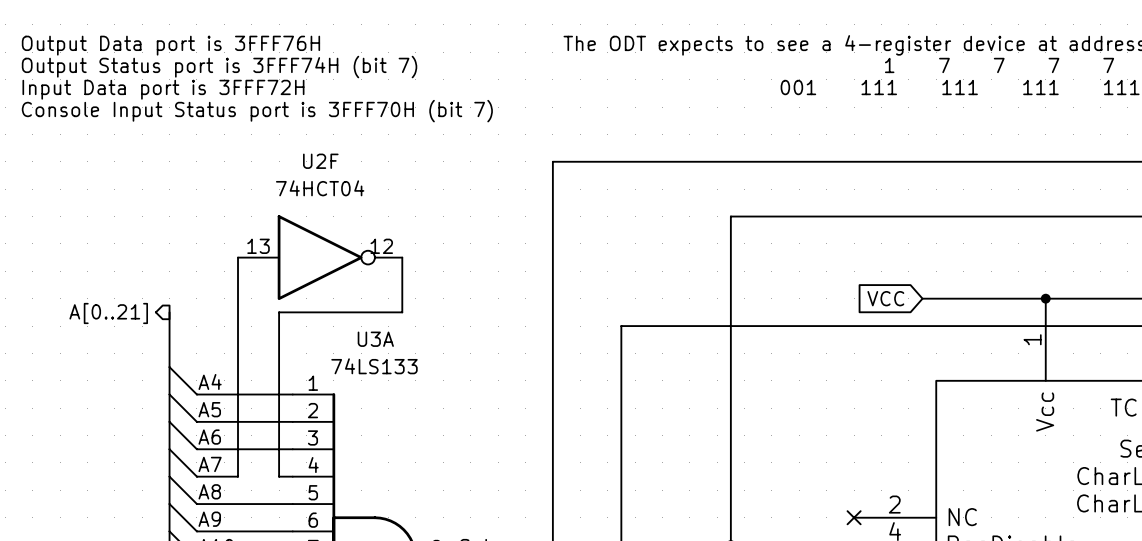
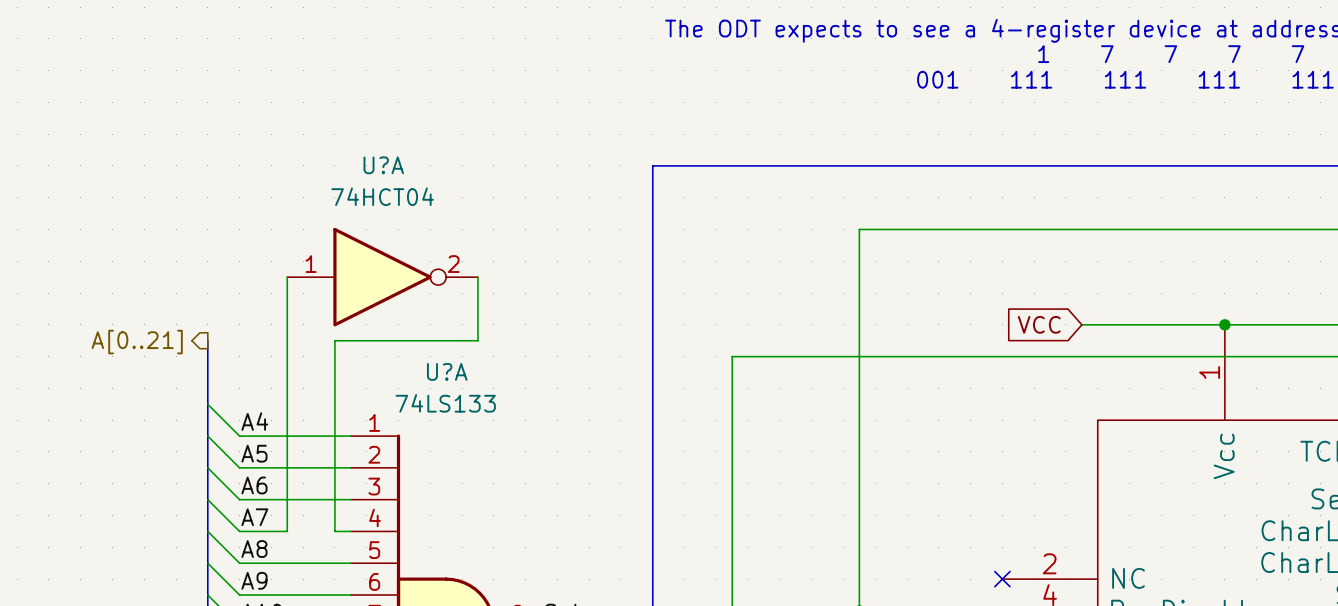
text: Output Data port is 3FFF76H (170, 45) -> none
text: Output Status port is 3FFF74H (bit 7) (219, 67) -> none
text: Input Data port is 3FFF72H (163, 89) -> none
text: Console Input Status port is 3FFF70H (bit 7) (257, 111) -> none
U2F name: U2F (320, 161) -> U?A (383, 165)
U2F pin number: 13 (258, 246) -> 1 (311, 264)
U2F pin number: 12 (381, 246) -> 2 (453, 264)
U3A name: U3A (375, 339) -> U?A (447, 371)

